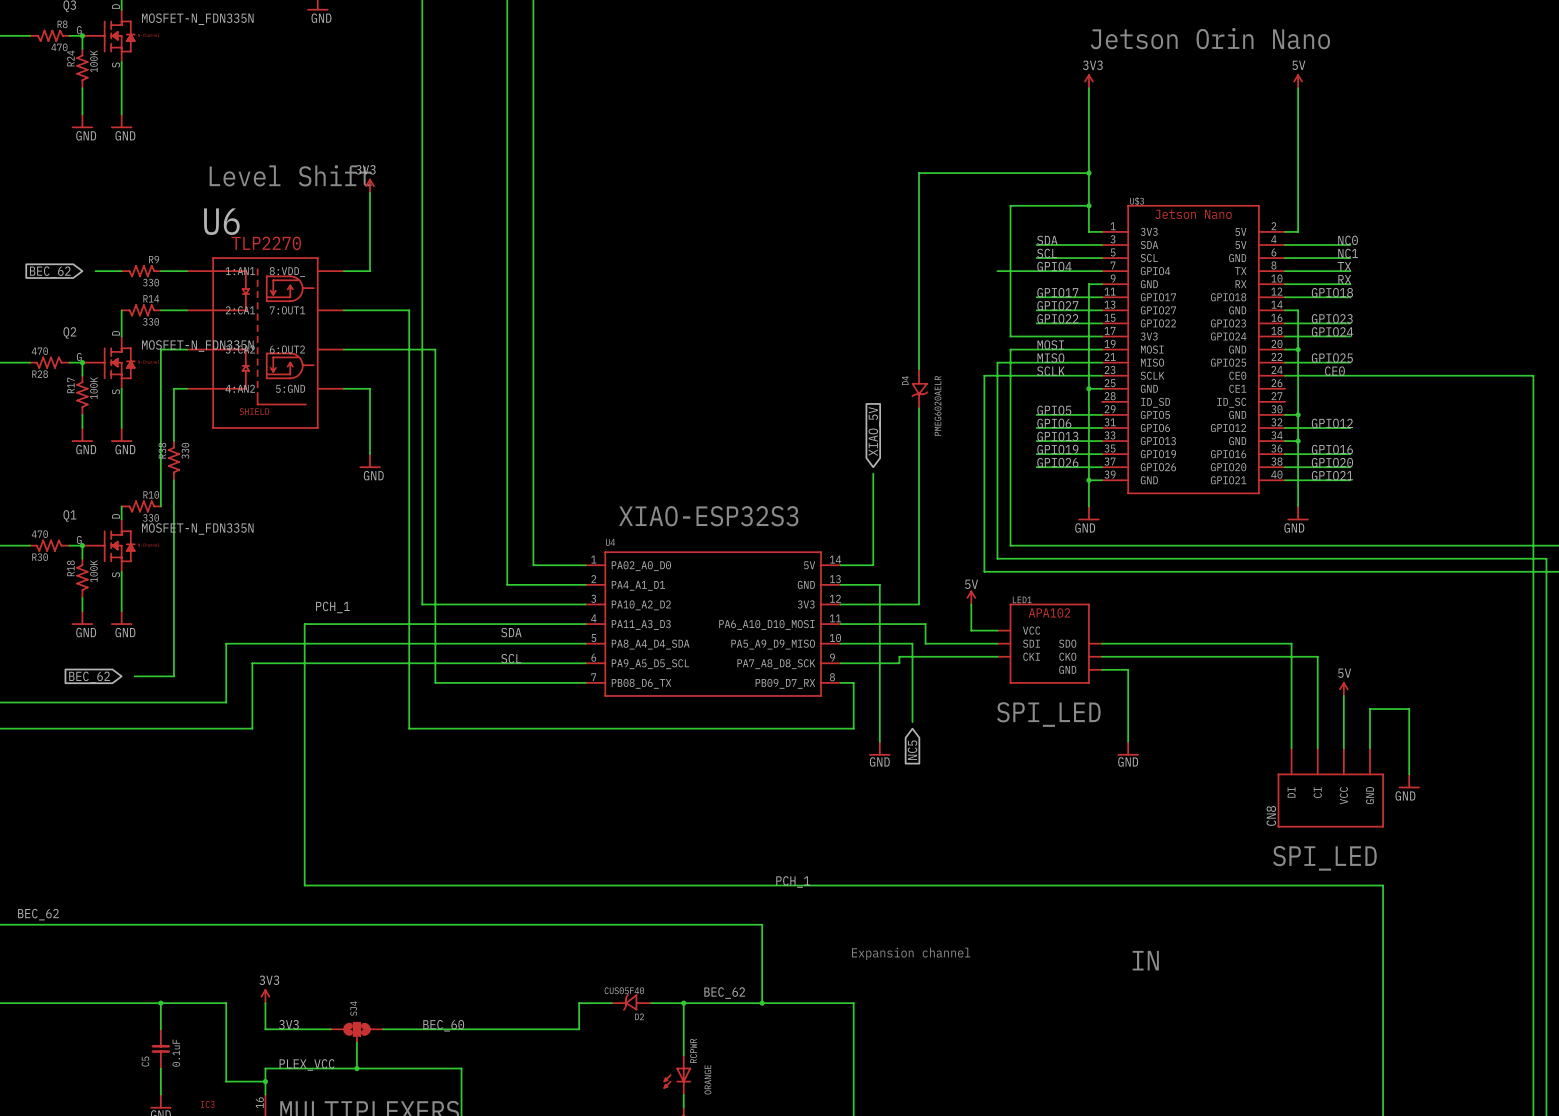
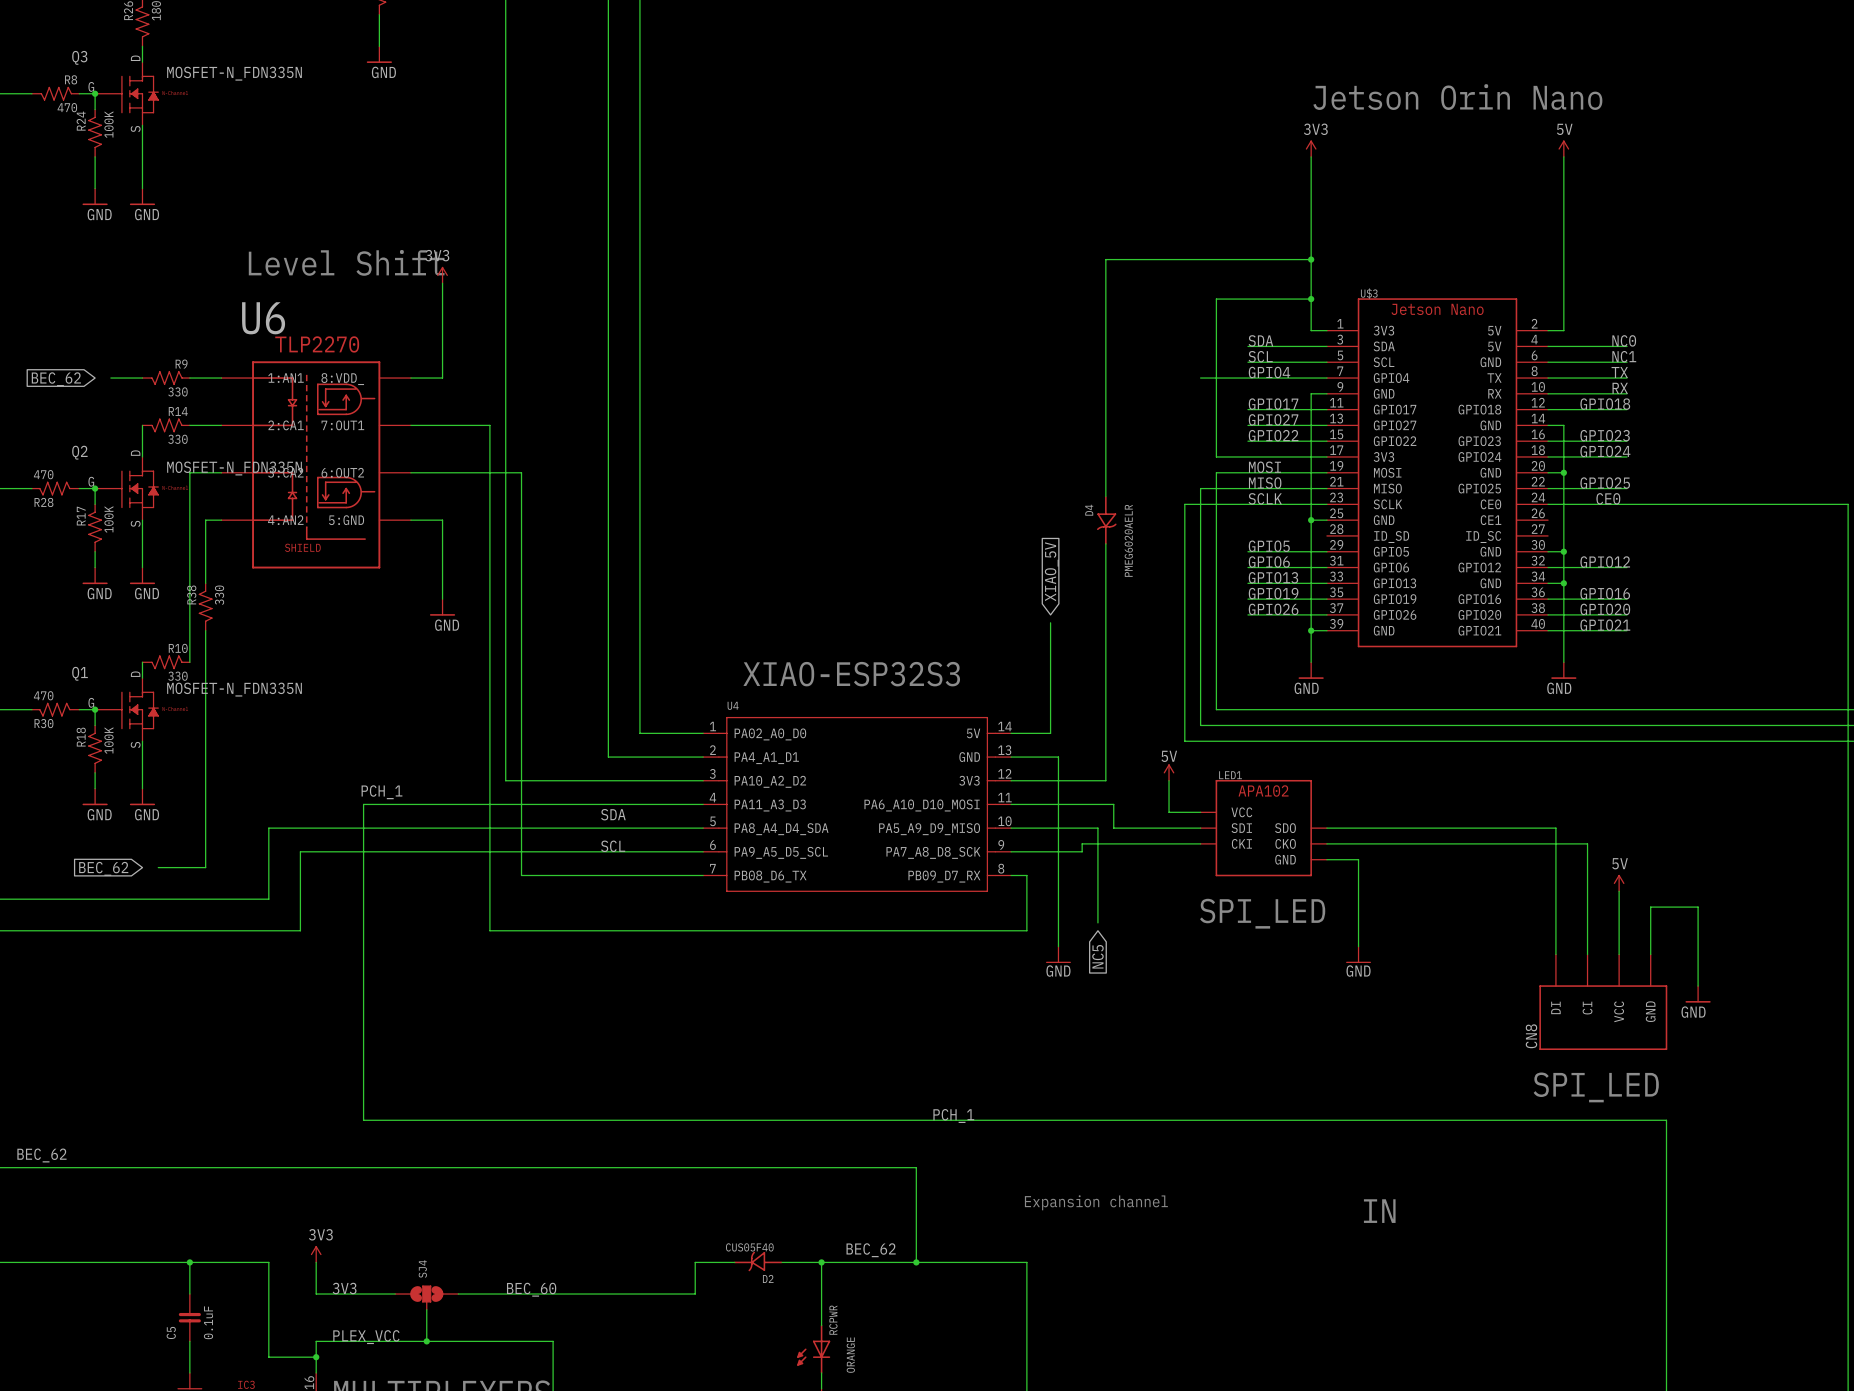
label position: PCH_1 (332, 607) -> PCH_1 (381, 792)

